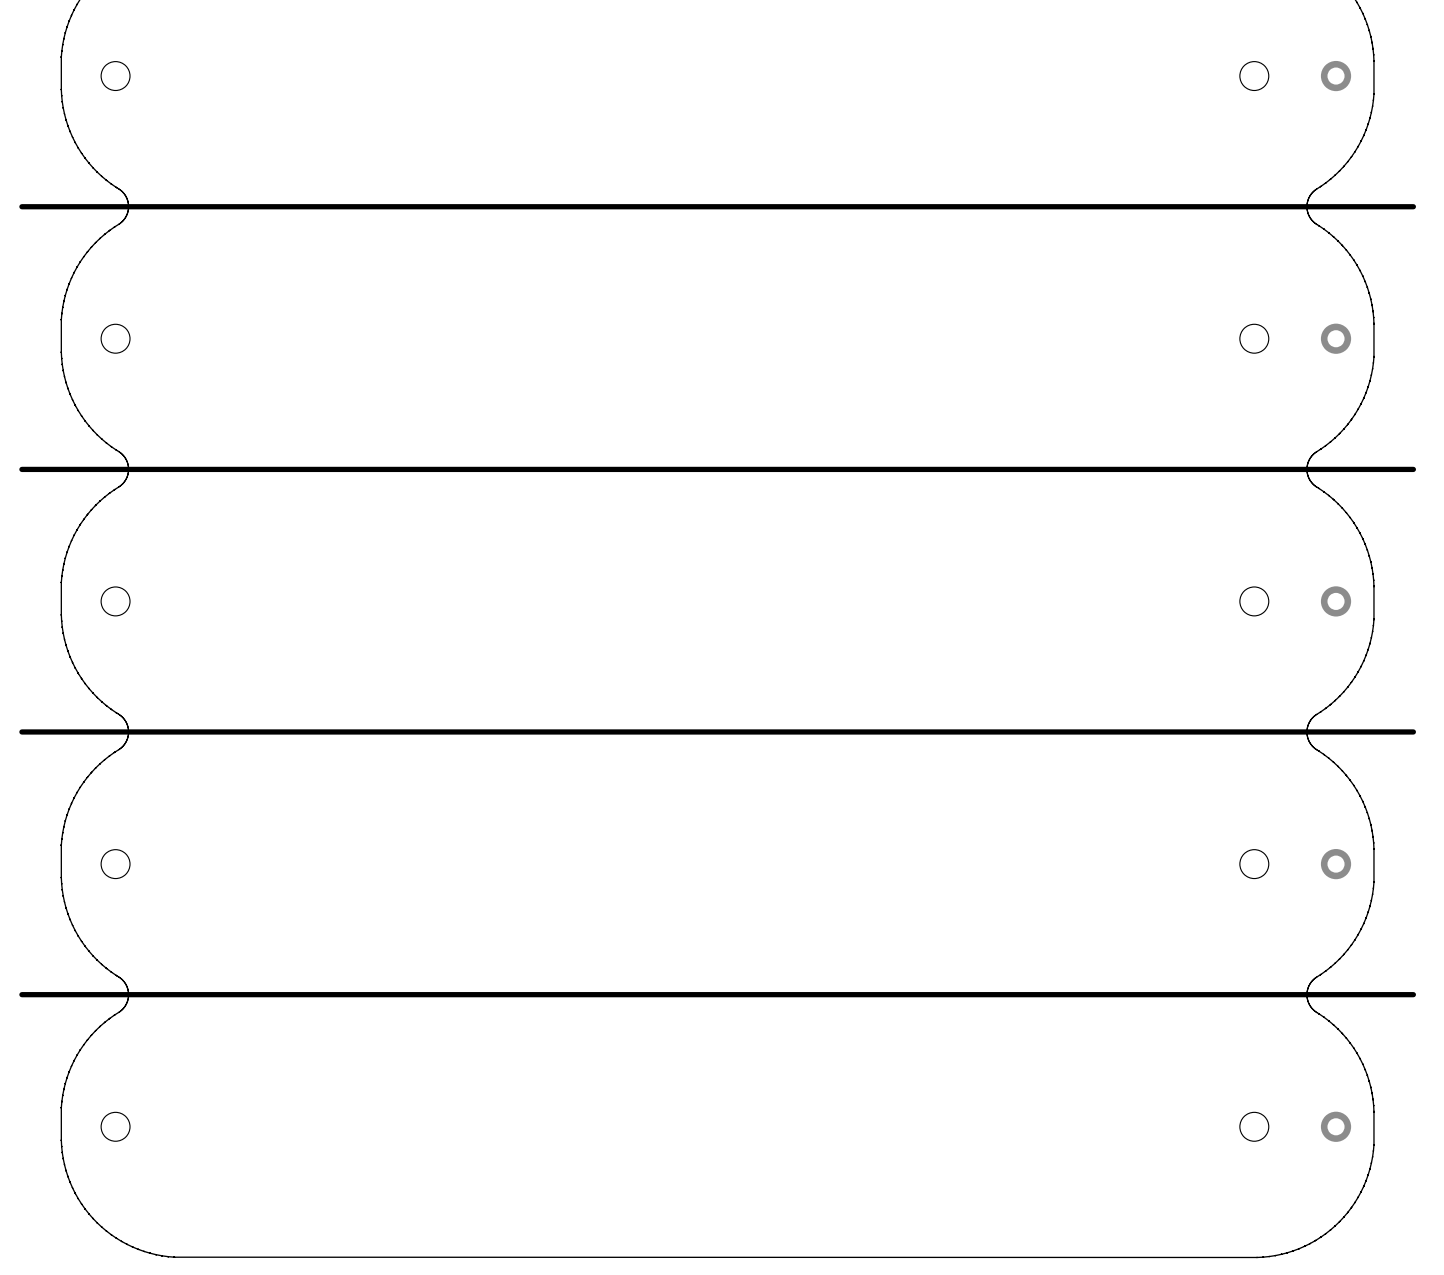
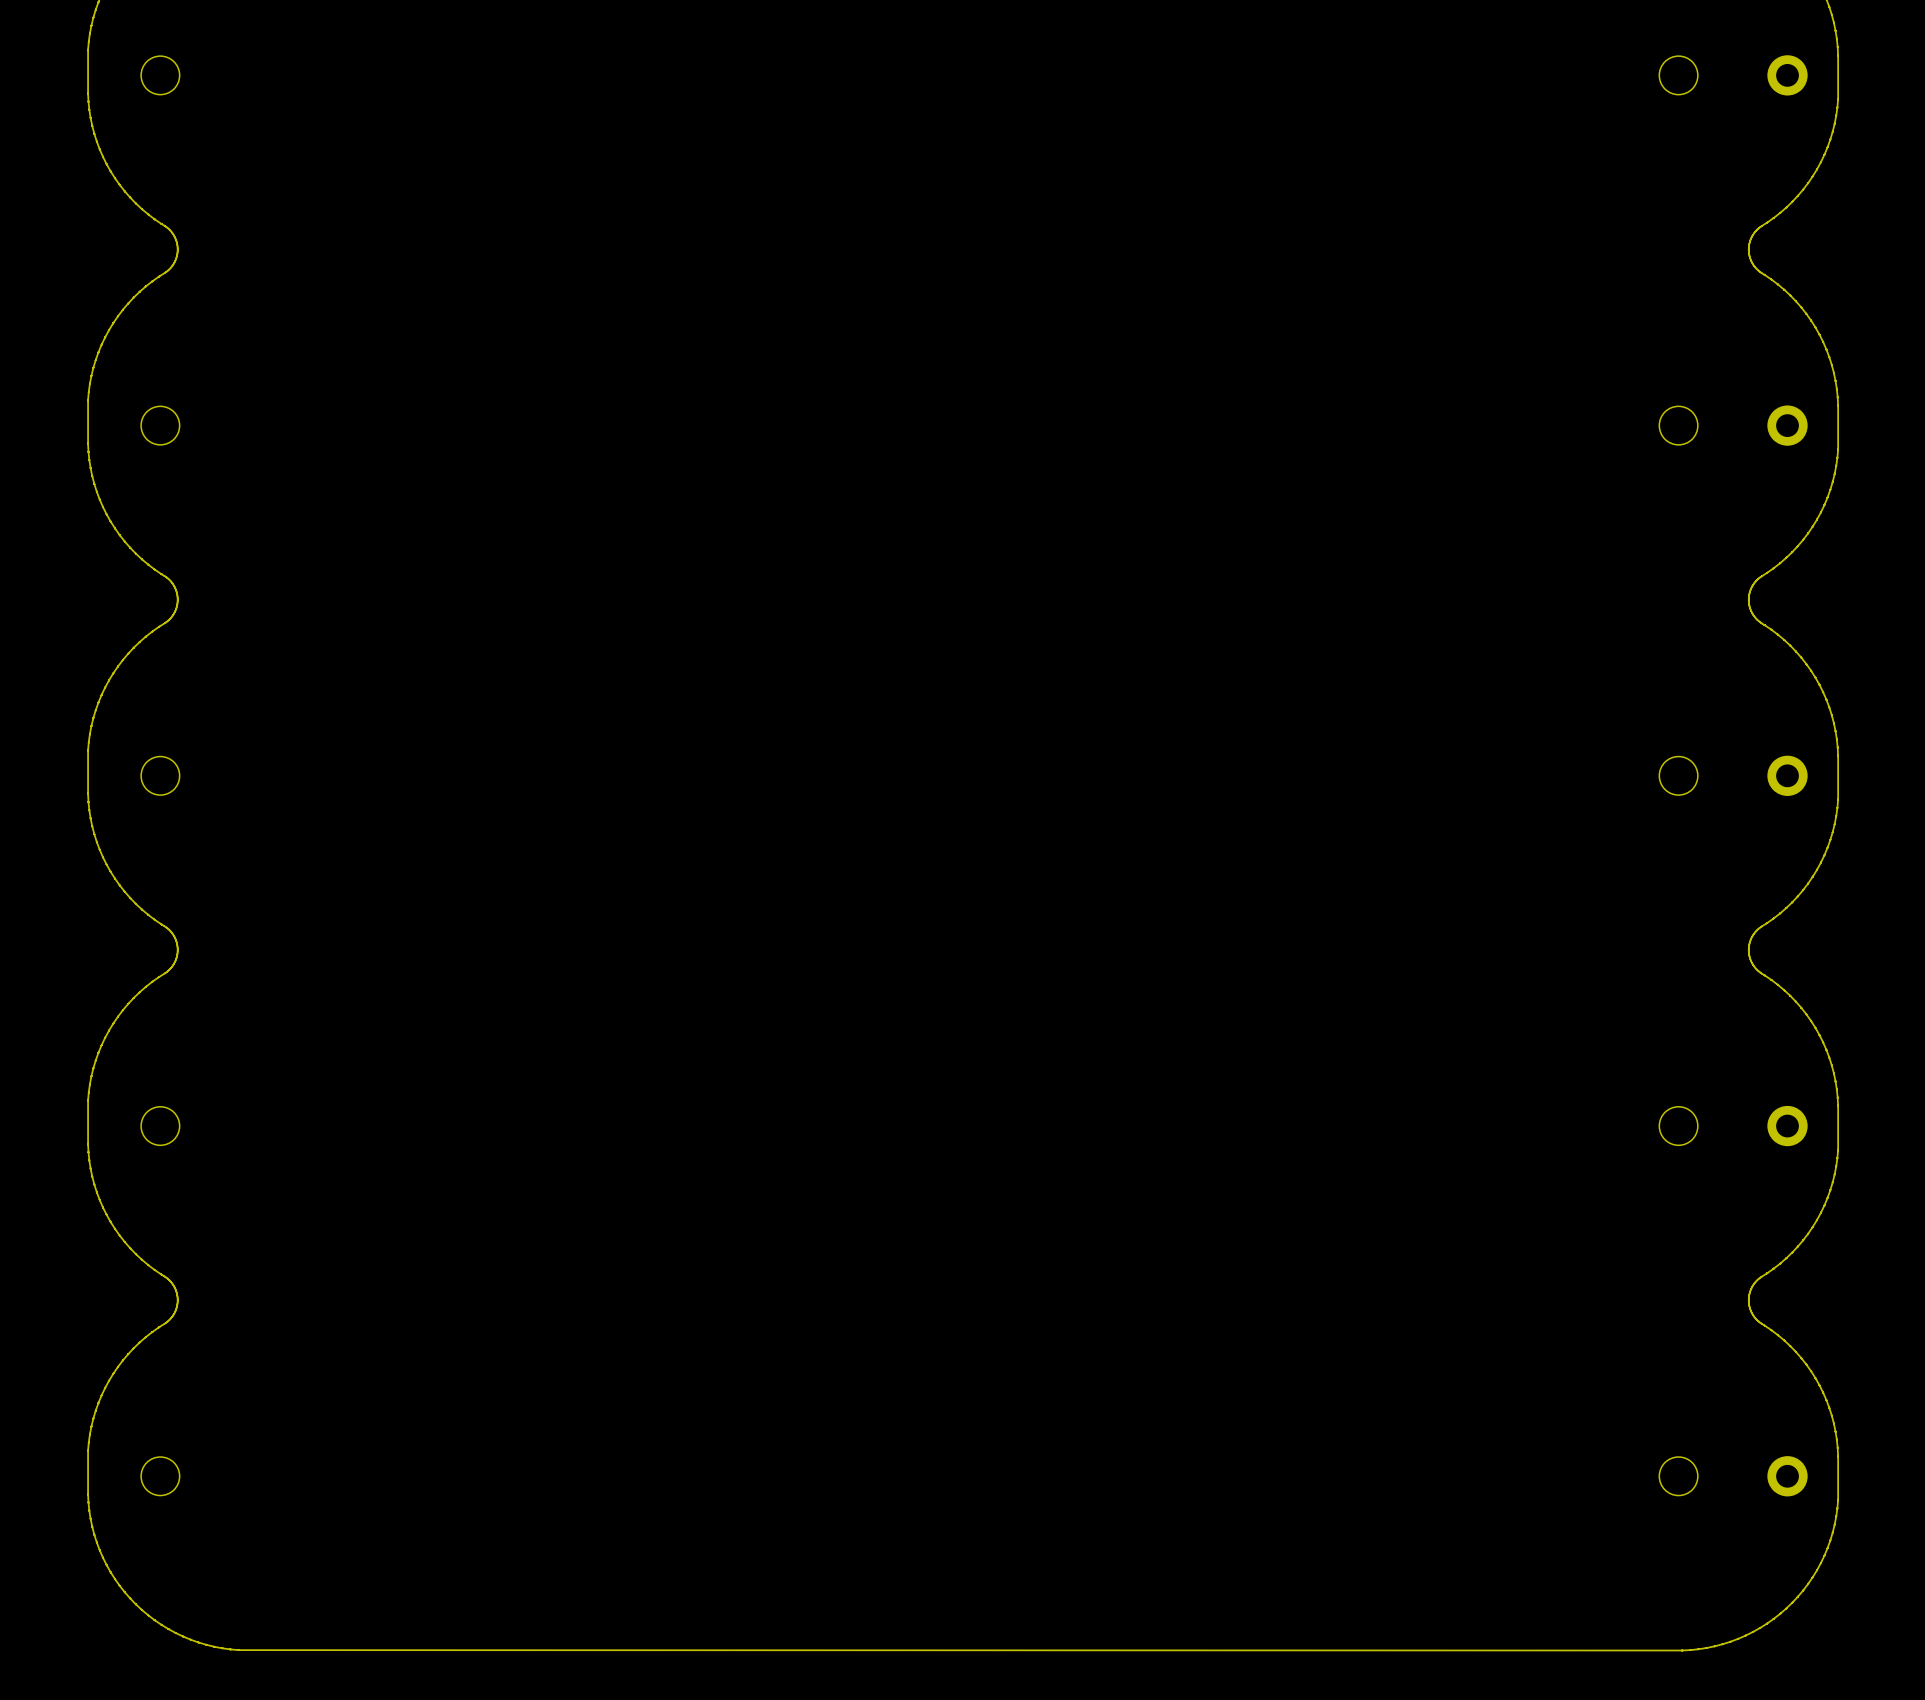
board edge: (1413, 206) (21, 206) -> none
board edge: (1413, 469) (21, 469) -> none
board edge: (1413, 731) (21, 731) -> none
board edge: (1413, 994) (21, 994) -> none

